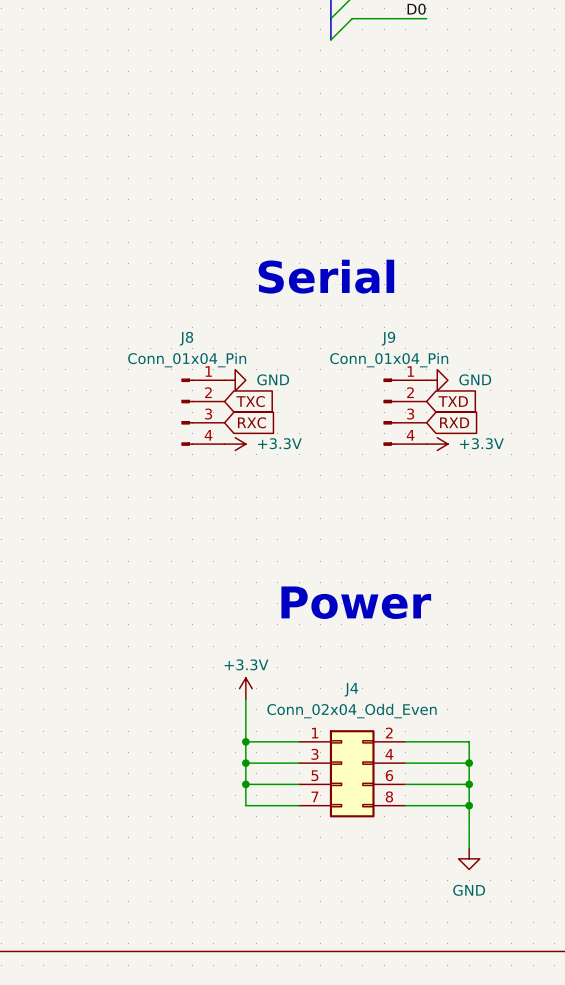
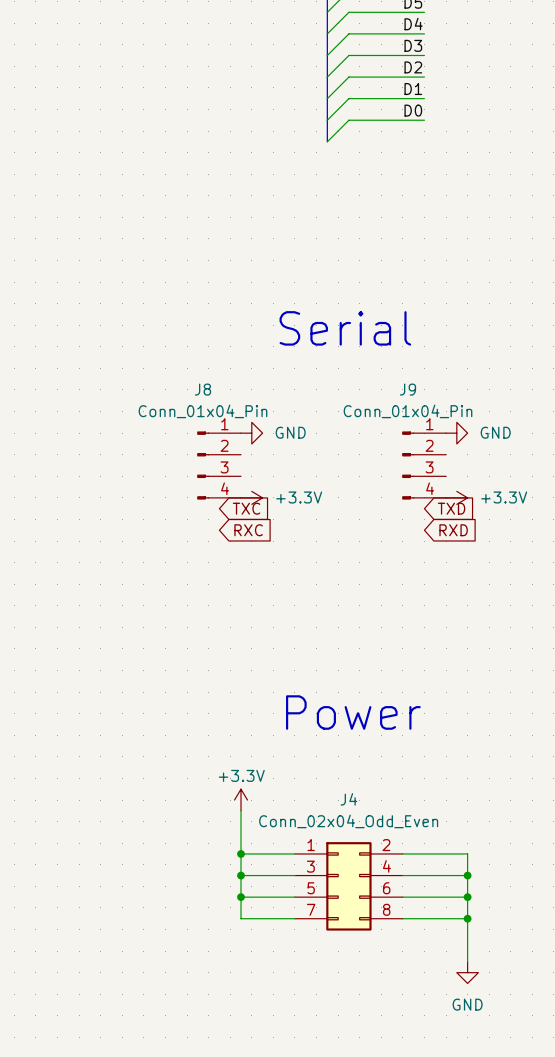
text position: Serial (326, 276) -> Serial (345, 328)
power symbol position: GND (235, 380) -> GND (251, 433)
power symbol position: GND (437, 380) -> GND (456, 433)
J8 position: (203, 412) -> (219, 465)
J9 position: (405, 412) -> (424, 465)
power symbol position: +3.3V (235, 444) -> +3.3V (251, 497)
power symbol position: +3.3V (437, 444) -> +3.3V (456, 497)

